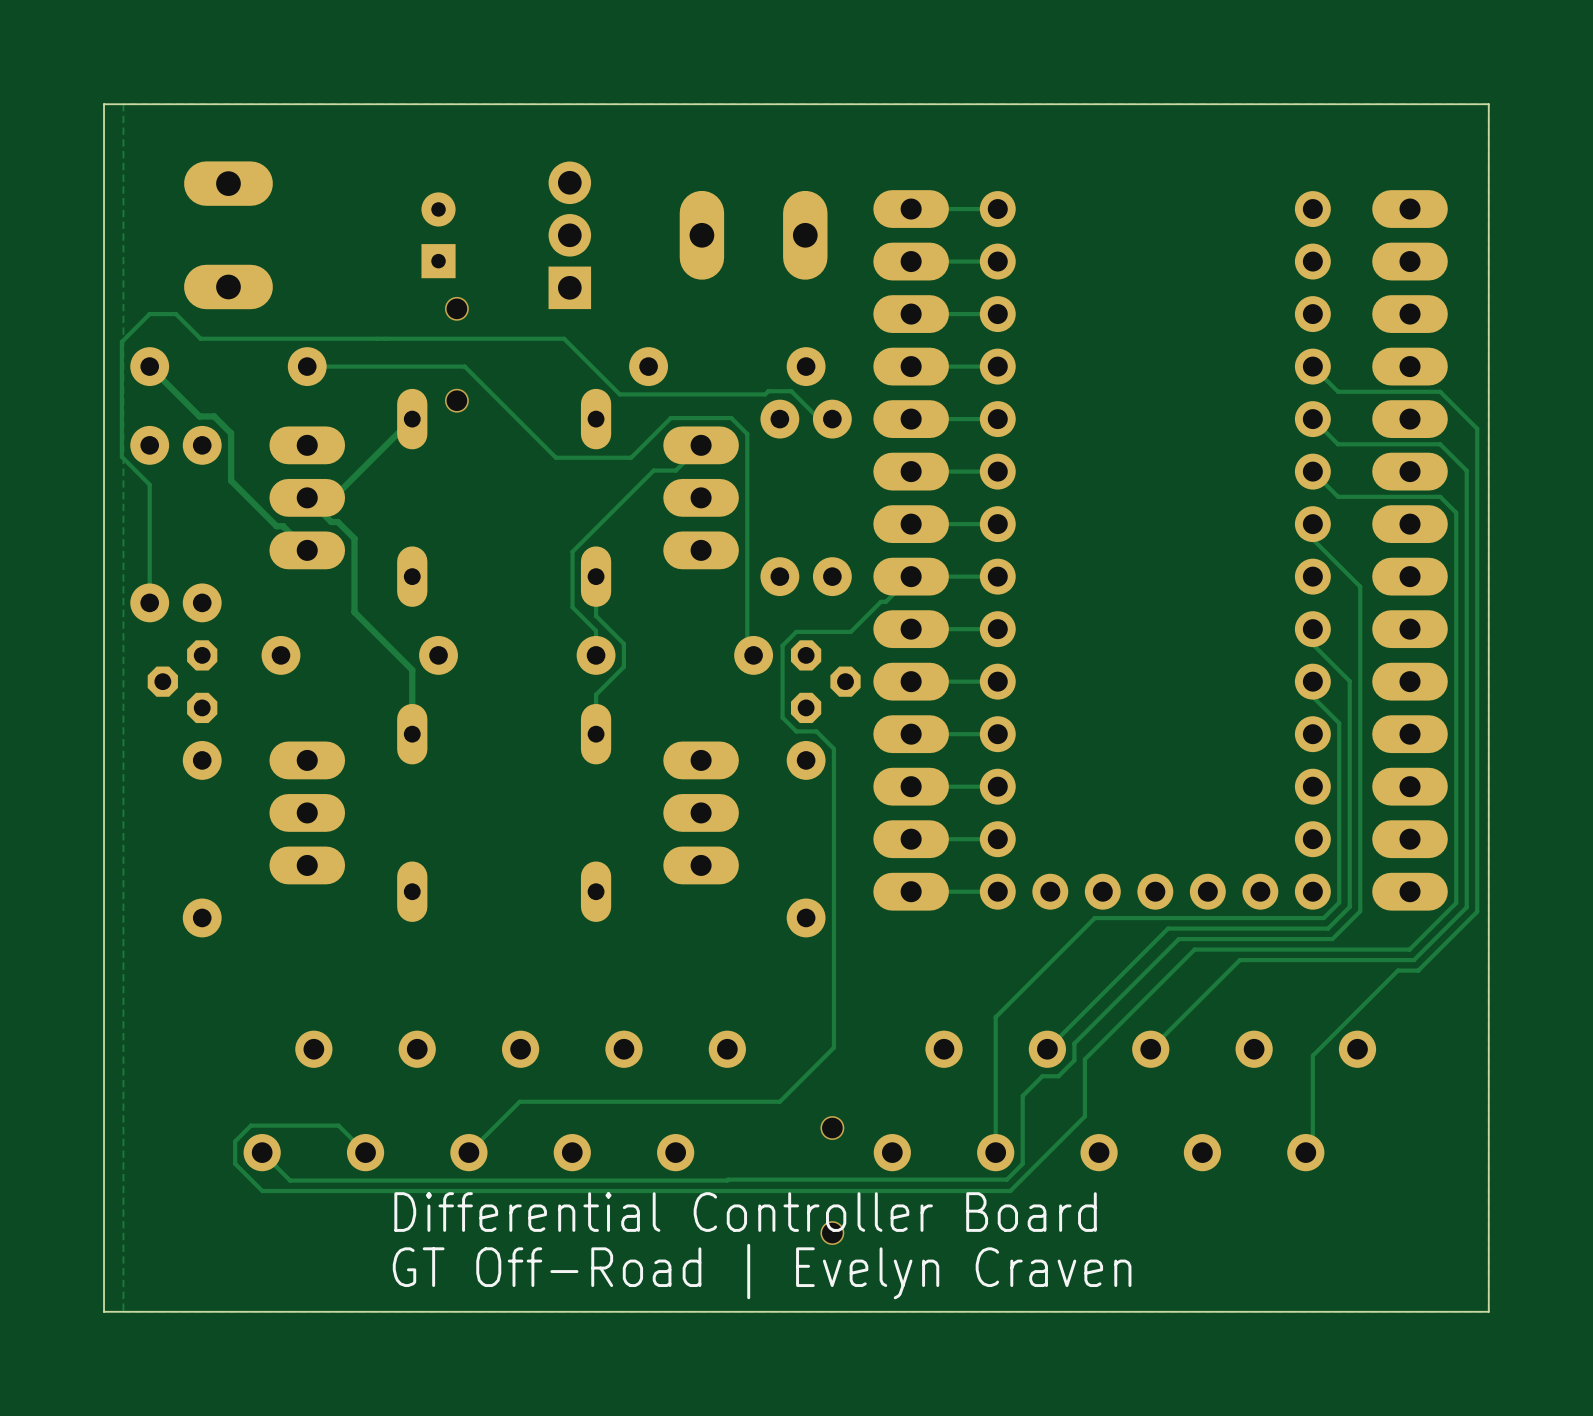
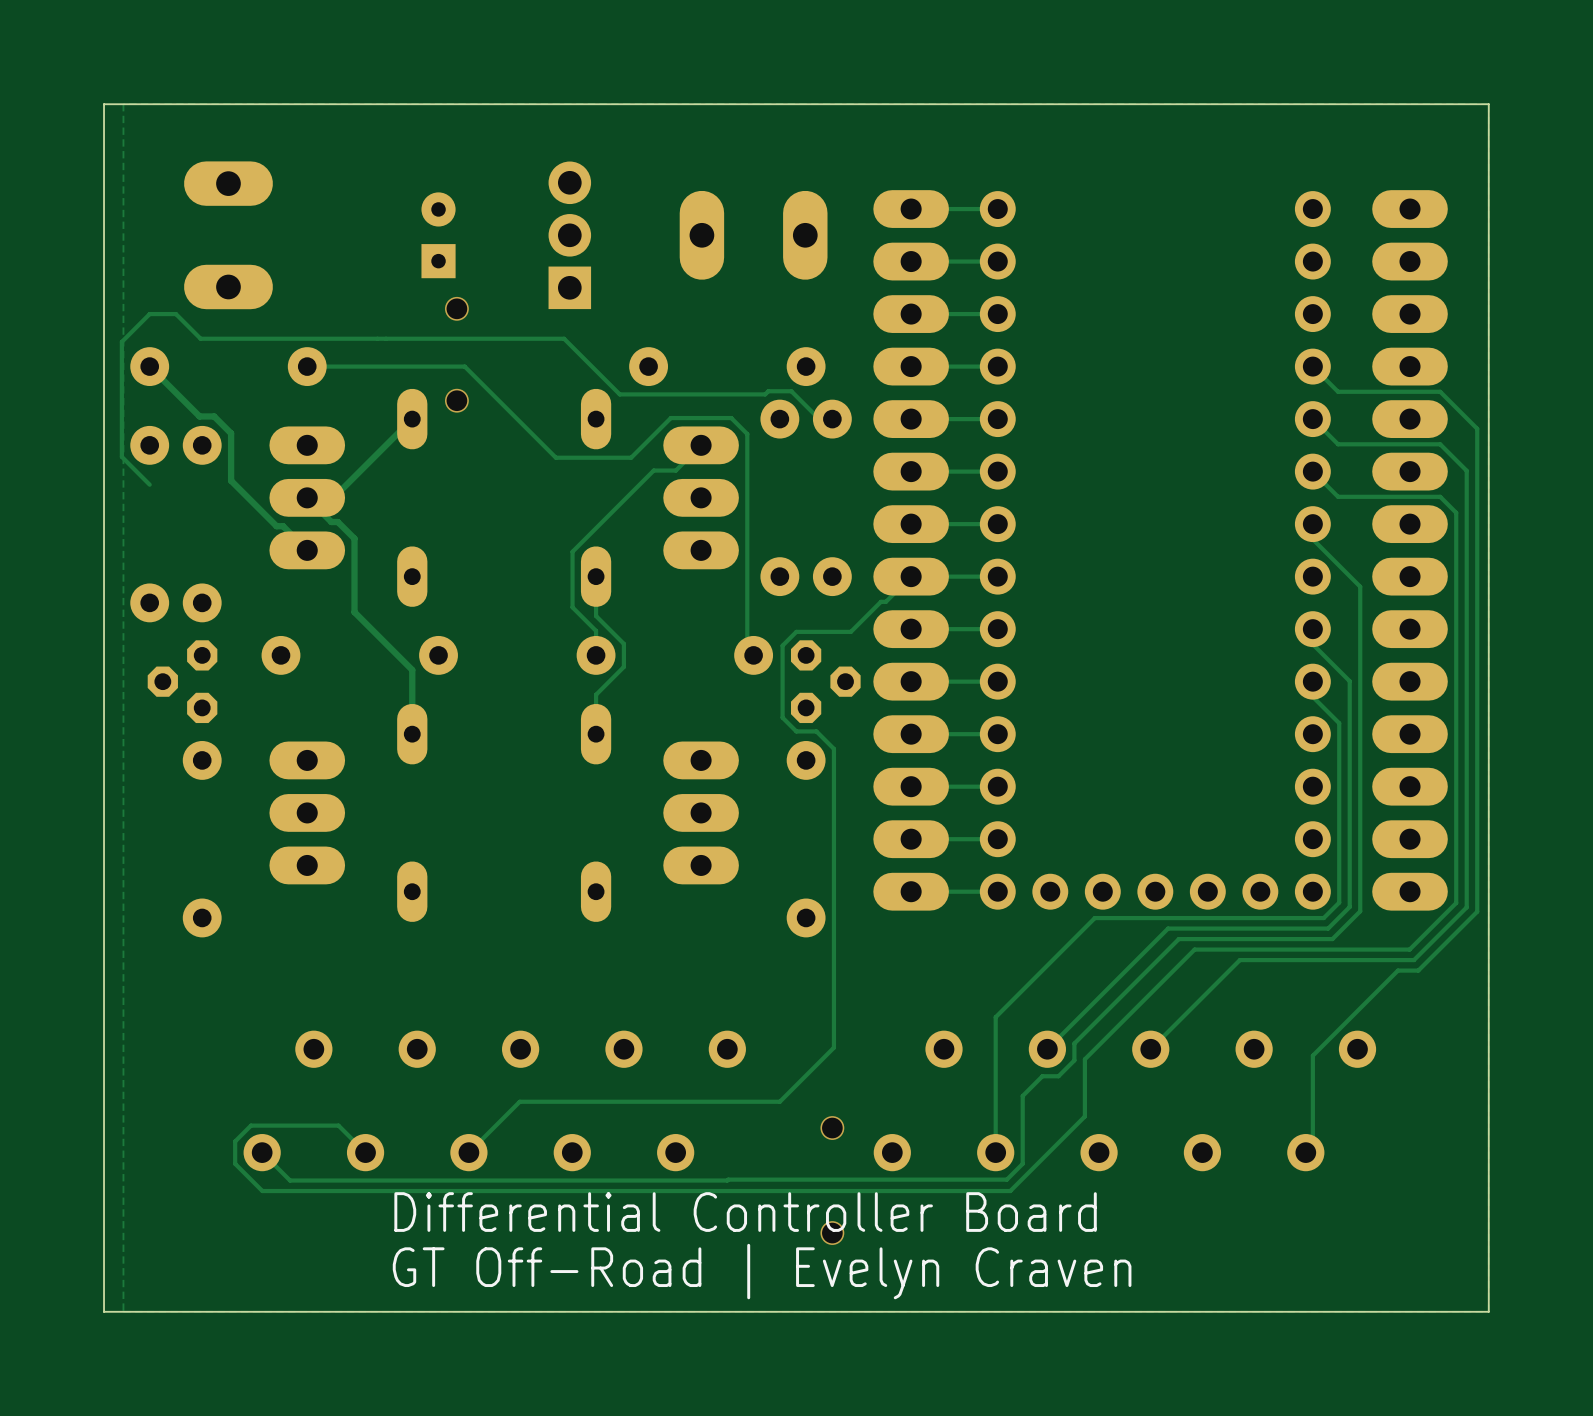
track: (149, 484) (149, 602) -> none

